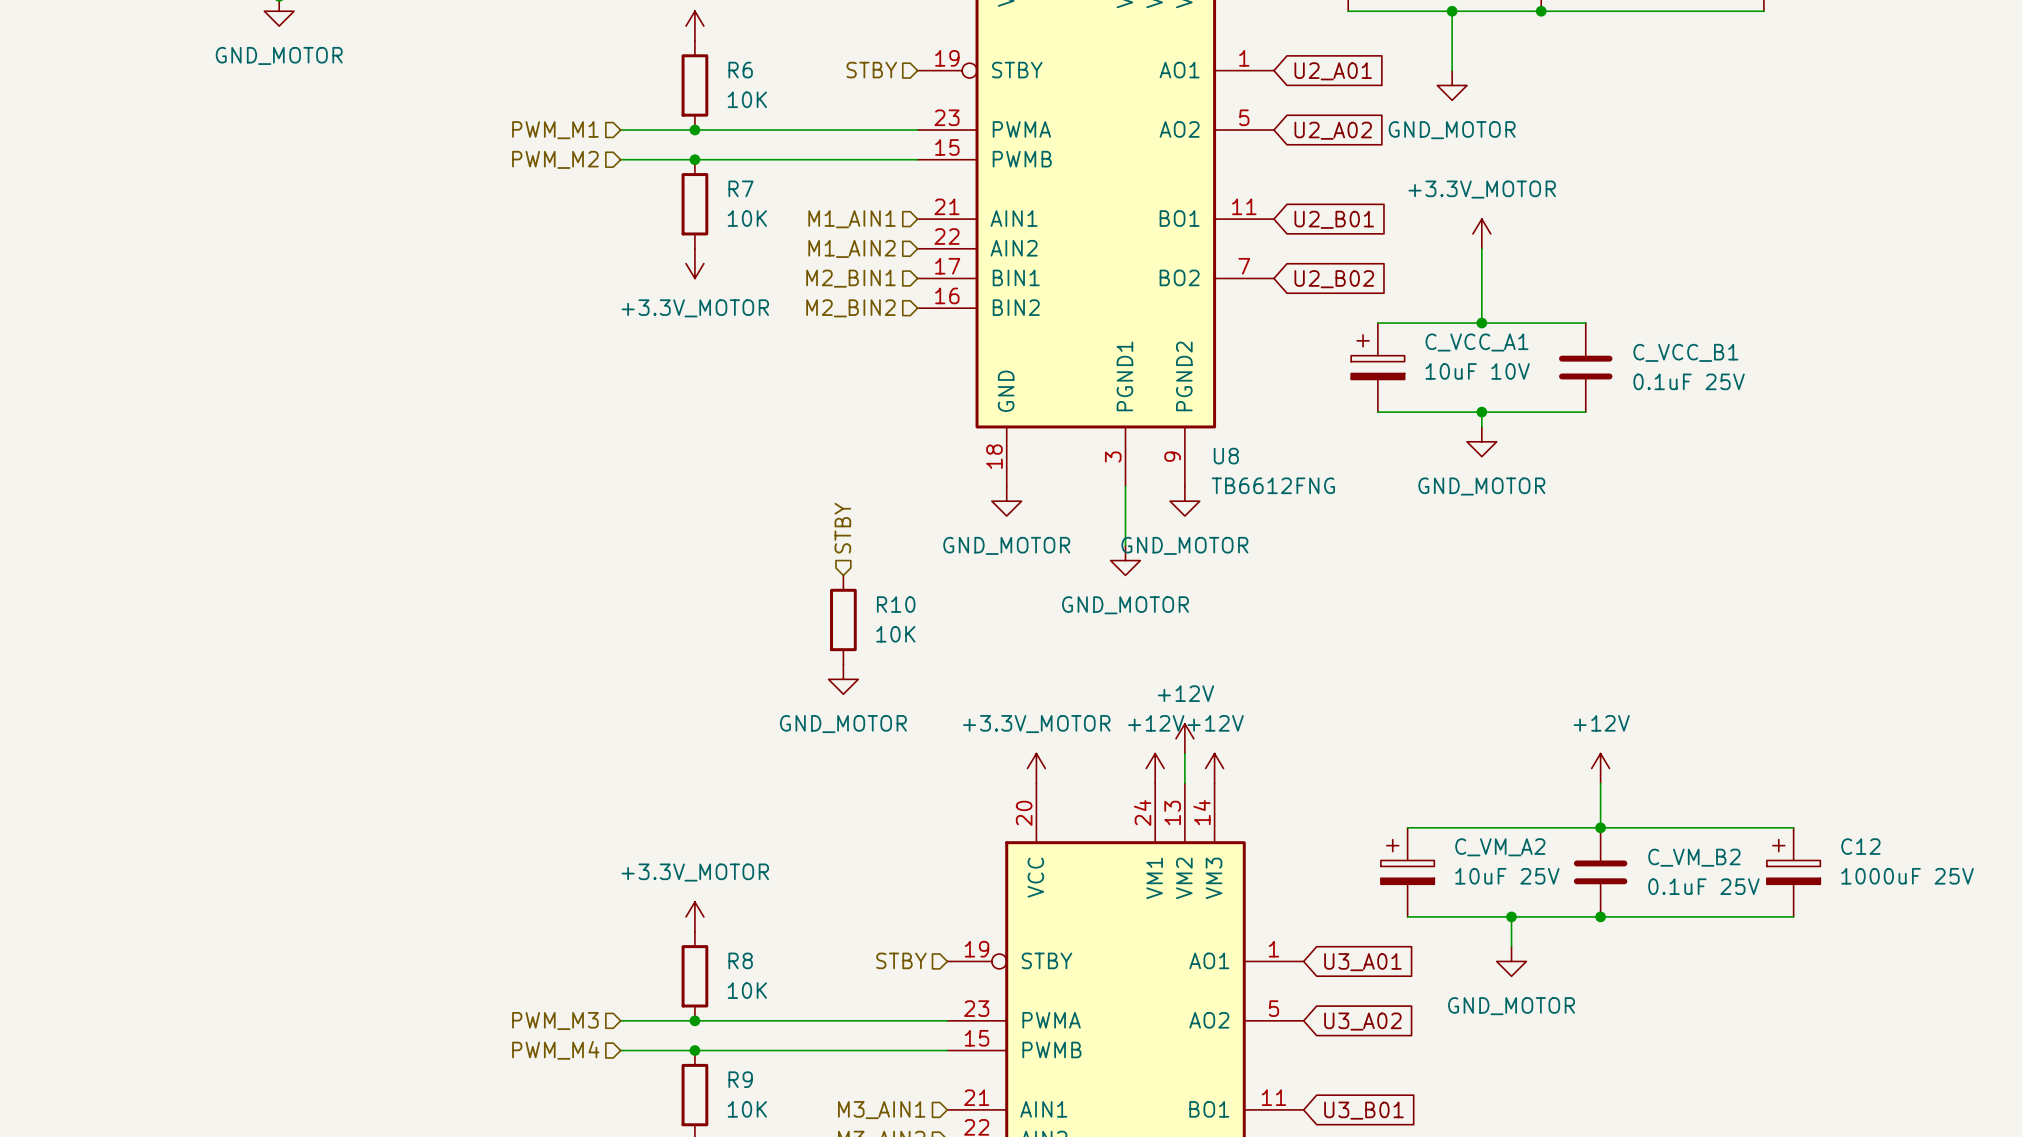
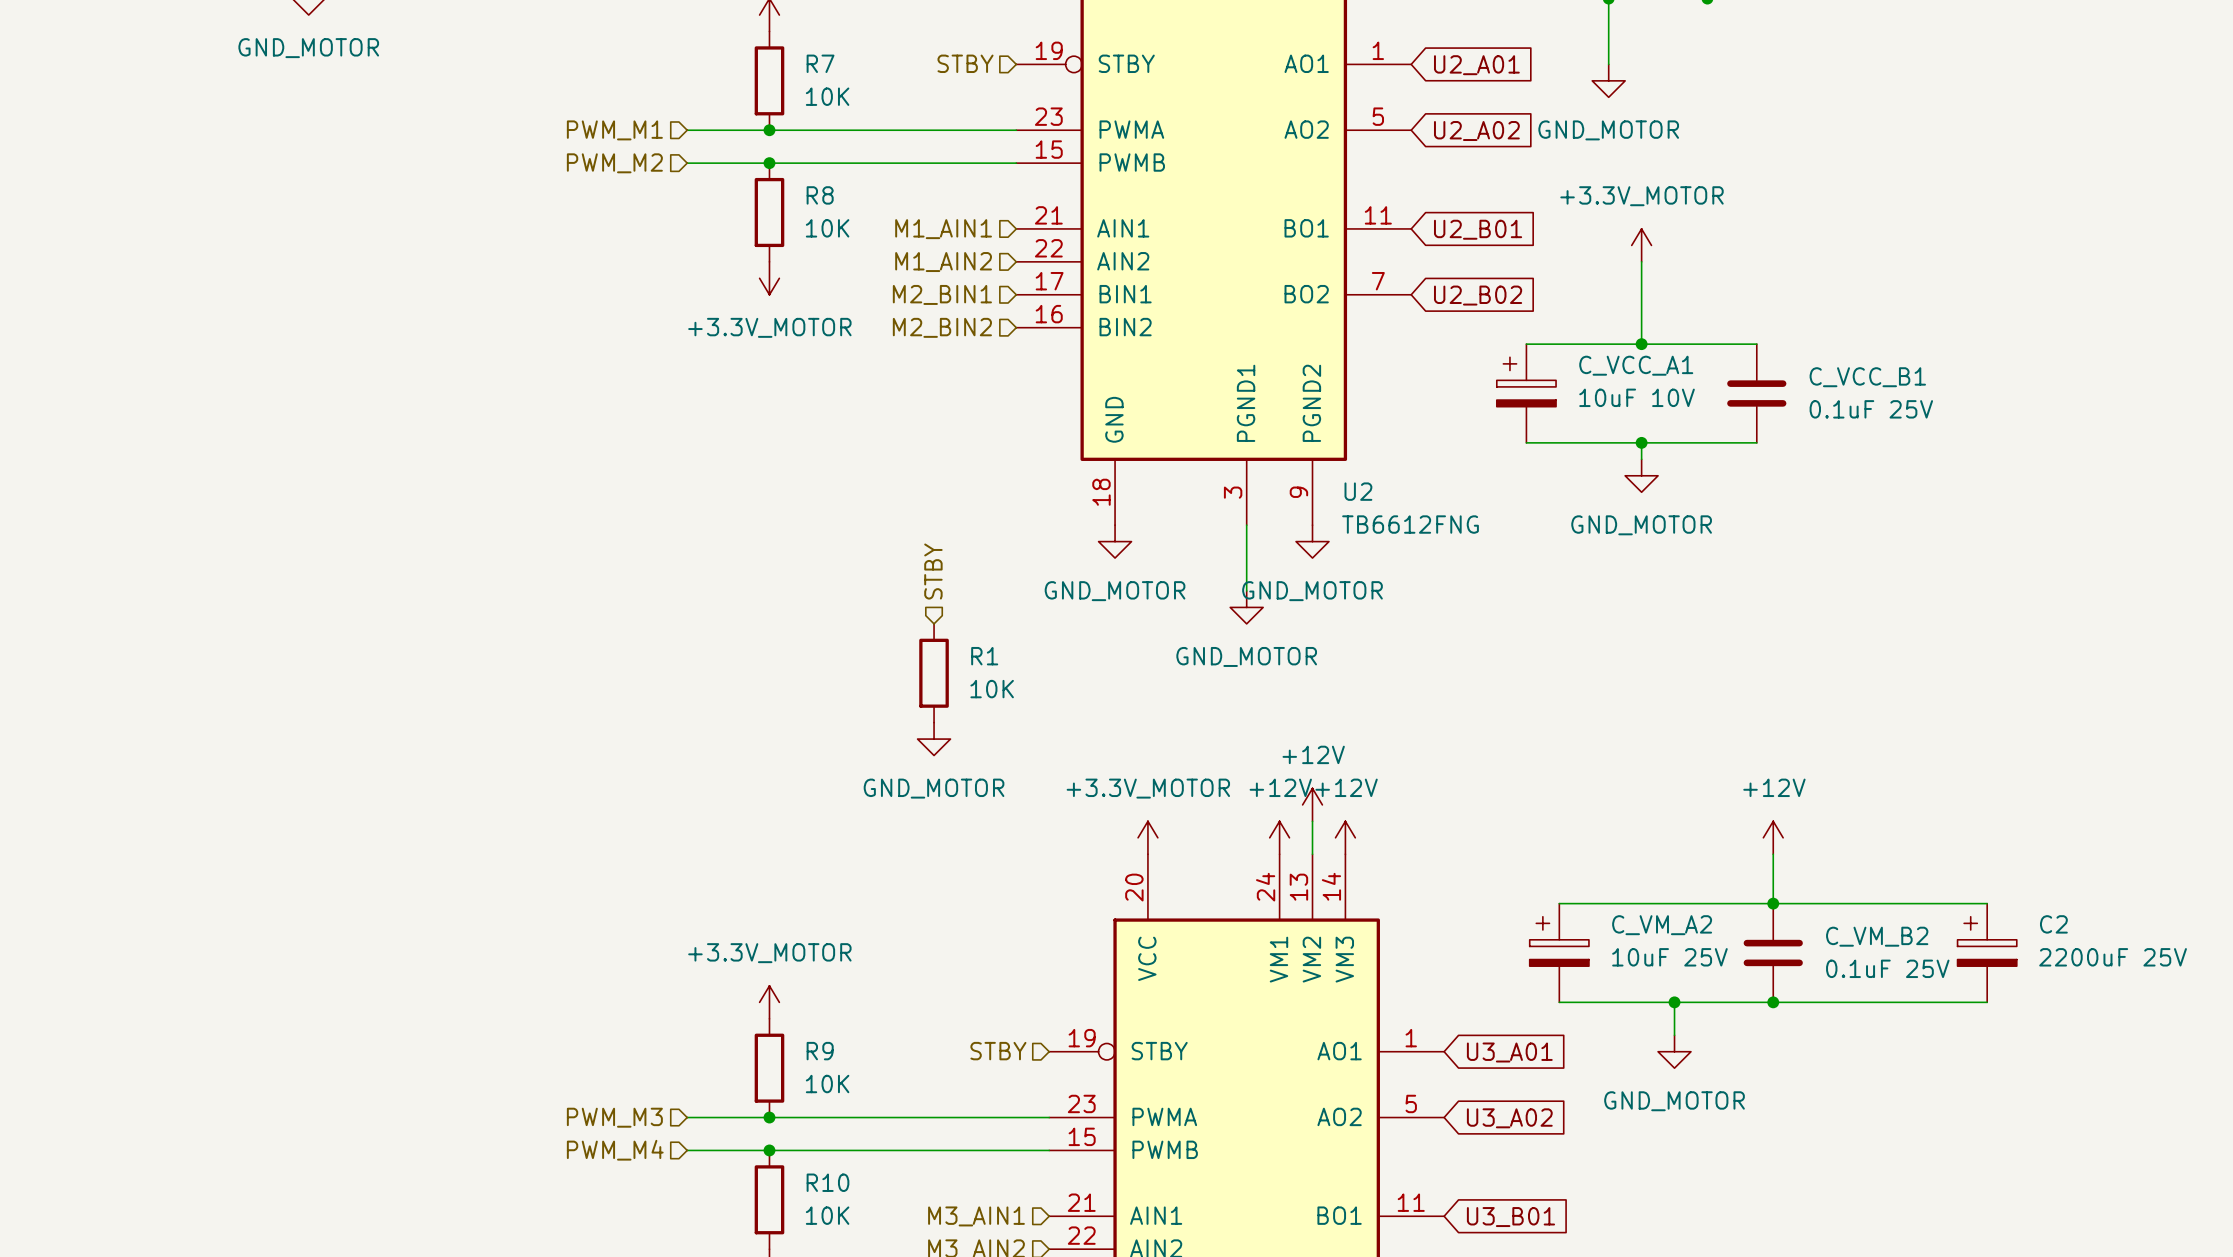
R6 name: R6 (740, 70) -> R7 (820, 63)
R7 name: R7 (741, 188) -> R8 (820, 195)
U8 name: U8 (1226, 456) -> U2 (1358, 491)
R10 name: R10 (896, 604) -> R1 (984, 656)
C12 name: C12 (1860, 846) -> C2 (2053, 924)
C12 value: 1000uF 25V (1907, 876) -> 2200uF 25V (2113, 957)
R8 name: R8 (740, 960) -> R9 (820, 1051)
R9 name: R9 (740, 1079) -> R10 (827, 1182)

